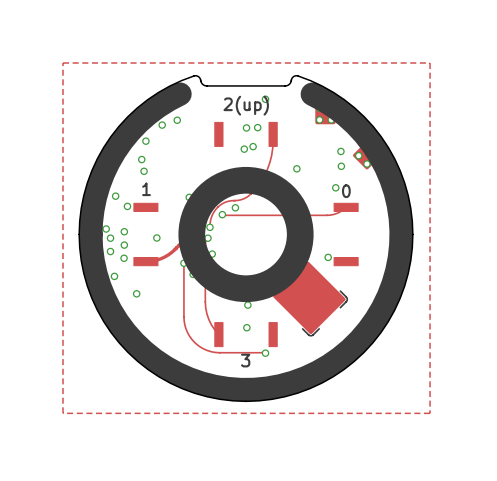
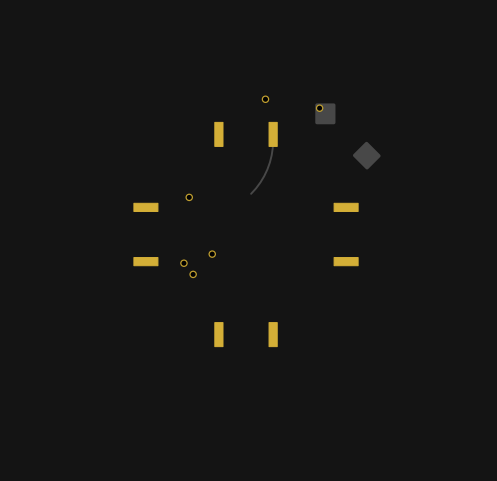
zone outline: (63, 63) (430, 63) (430, 413) (63, 413) (63, 63) -> none
board edge: (193, 76) (198, 76) (202, 83) (206, 85) (285, 85) (296, 75) (322, 86) (354, 107) (373, 126) (394, 159) (404, 183) (412, 221) (412, 247) (404, 286) (394, 310) (372, 342) (354, 361) (333, 376) (297, 393) (272, 399) (232, 400) (194, 393) (170, 383) (137, 361) (119, 342) (103, 321) (87, 286) (81, 260) (79, 221) (87, 183) (97, 159) (118, 126) (137, 107) (169, 86) (193, 76) -> none
line: (180, 94) (158, 106) (138, 122) (122, 141) (108, 162) (98, 185) (92, 209) (90, 234) (93, 260) (99, 286) (110, 310) (125, 332) (144, 351) (165, 367) (189, 378) (214, 386) (240, 389) (267, 388) (293, 382) (317, 372) (339, 358) (359, 340) (375, 319) (388, 296) (396, 270) (400, 244) (400, 218) (395, 192) (385, 167) (372, 144) (355, 124) (335, 107) (312, 94) -> none
text: 2(up) (246, 105) -> none
via: (319, 119) -> none
via: (331, 119) -> none
via: (177, 120) -> none
via: (162, 125) -> none
via: (246, 127) -> none
via: (257, 127) -> none
via: (145, 141) -> none
via: (253, 146) -> none
via: (244, 149) -> none
via: (340, 151) -> none
via: (358, 155) -> none
via: (141, 159) -> none
via: (366, 163) -> none
via: (341, 166) -> none
via: (296, 168) -> none
via: (144, 171) -> none
via: (335, 187) -> none
text: 1 (146, 189) -> none
text: 0 (346, 191) -> none
track: (250, 194) (243, 198) (227, 201) (219, 205) (211, 215) (209, 227) -> none
via: (115, 196) -> none
via: (127, 206) -> none
via: (235, 207) -> none
track: (346, 207) (337, 213) (326, 215) (222, 214) -> none
via: (222, 214) -> none
track: (187, 224) (183, 239) (171, 252) (161, 258) (145, 261) -> none
via: (209, 227) -> none
via: (106, 229) -> none
via: (124, 231) -> none
via: (110, 238) -> none
via: (156, 238) -> none
track: (207, 238) (205, 244) (205, 307) (211, 325) (218, 334) -> none
via: (207, 238) -> none
via: (124, 245) -> none
via: (110, 251) -> none
part: (263, 251) -> none
via: (328, 257) -> none
via: (124, 258) -> none
track: (183, 263) (184, 320) (187, 332) (194, 342) (204, 349) (215, 352) (265, 353) -> none
via: (114, 276) -> none
via: (136, 293) -> none
via: (247, 305) -> none
via: (246, 327) -> none
via: (265, 353) -> none
text: 3 (245, 360) -> none

